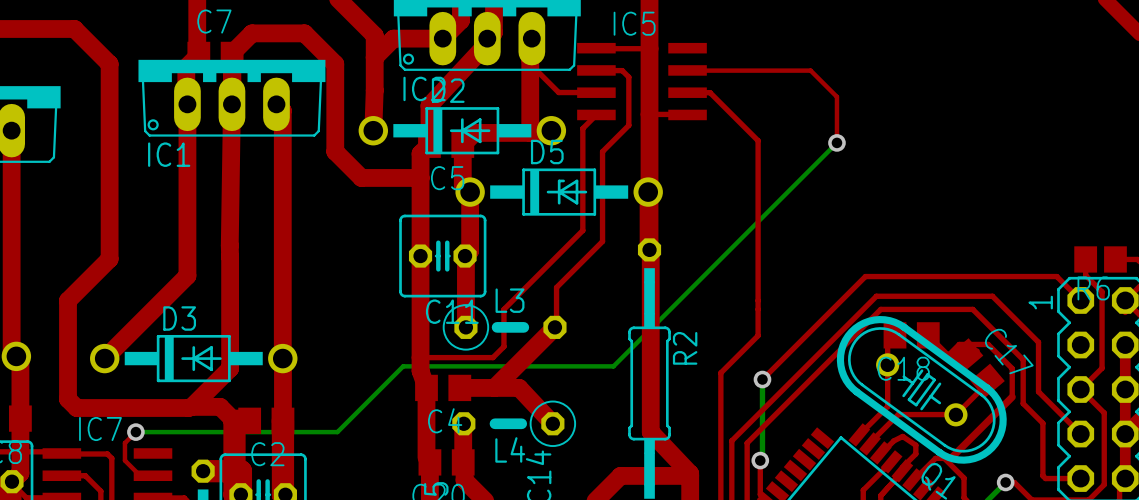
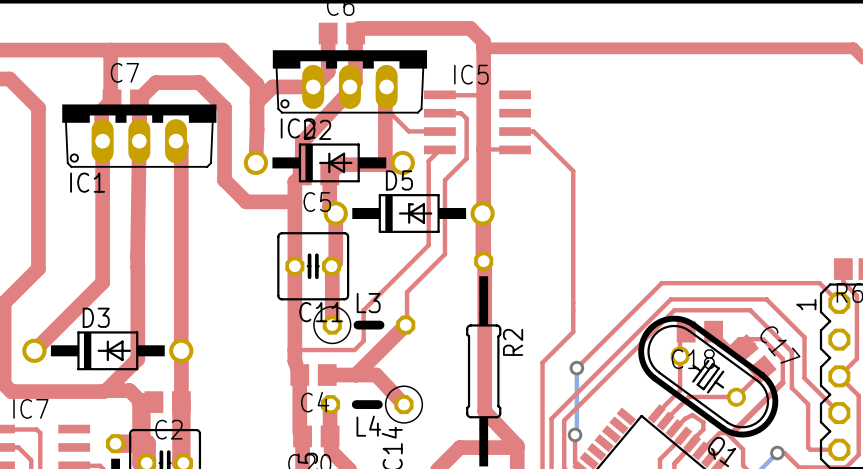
top track: (687, 70) (810, 70) (836, 96) (836, 142) -> none
bottom track: (836, 142) (613, 366) (403, 366) (337, 432) (135, 432) -> none
via: (836, 142) -> none
top track: (135, 432) (124, 443) (124, 460) (140, 475) (153, 475) -> none
via: (135, 432) -> none

